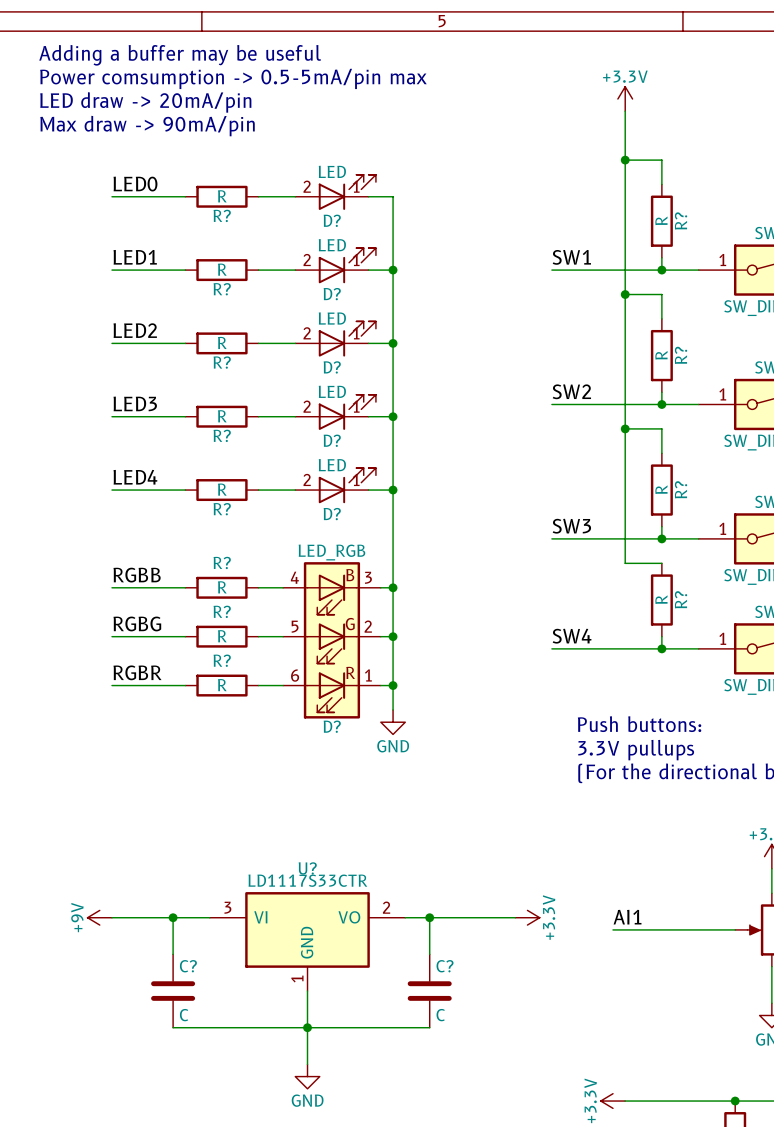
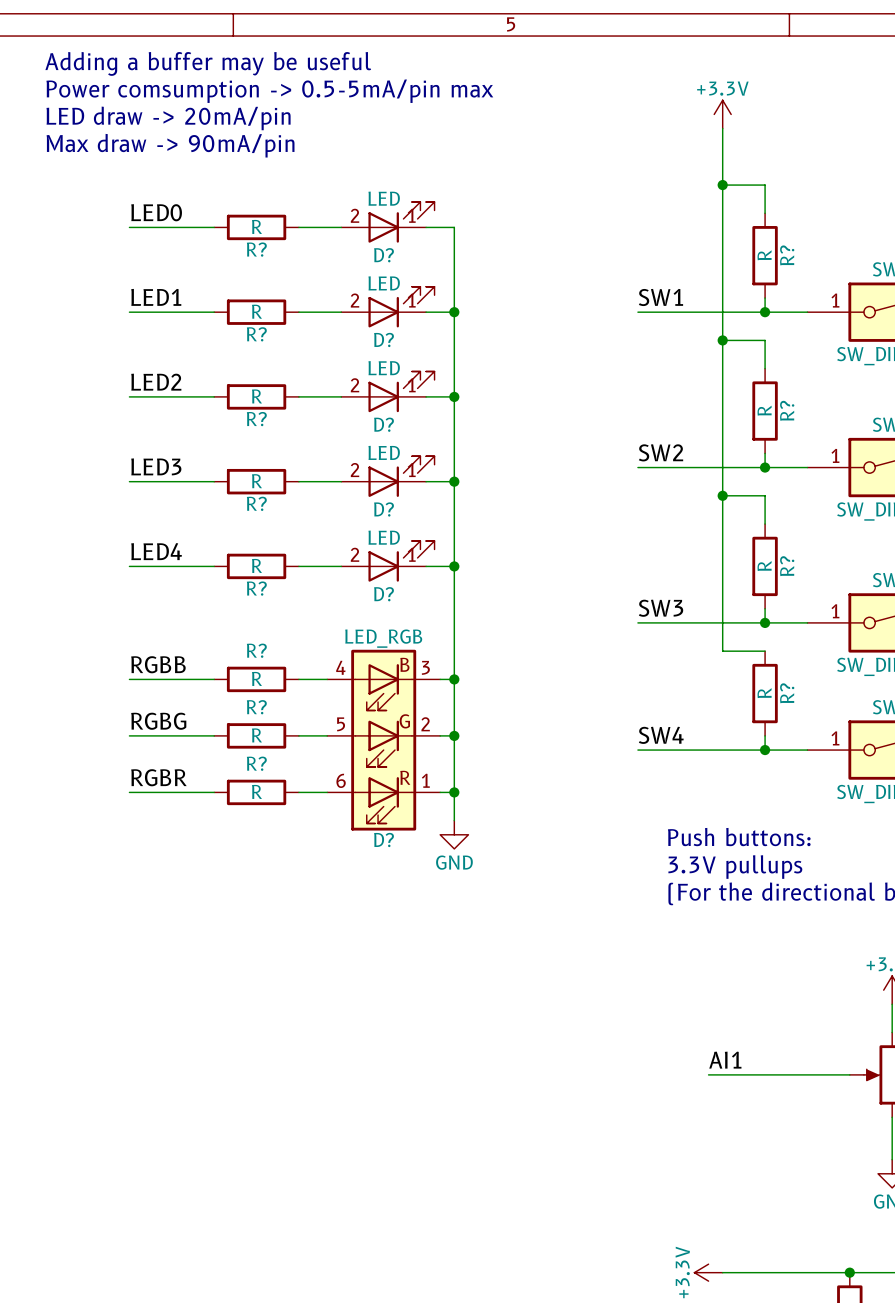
power symbol: +9V (99, 917) -> none
wire: (111, 917) (209, 917) -> none
wire: (173, 917) (173, 954) -> none
junction: (173, 917) -> none
wire: (405, 917) (515, 917) -> none
wire: (429, 917) (429, 954) -> none
junction: (429, 917) -> none
power symbol: +3.3V (527, 917) -> none
U?: LD1117S33CTR (307, 941) -> none
C?: C (173, 991) -> none
wire: (307, 991) (307, 1064) -> none
C?: C (429, 991) -> none
wire: (173, 1027) (429, 1027) -> none
junction: (307, 1027) -> none
power symbol: GND (307, 1076) -> none

